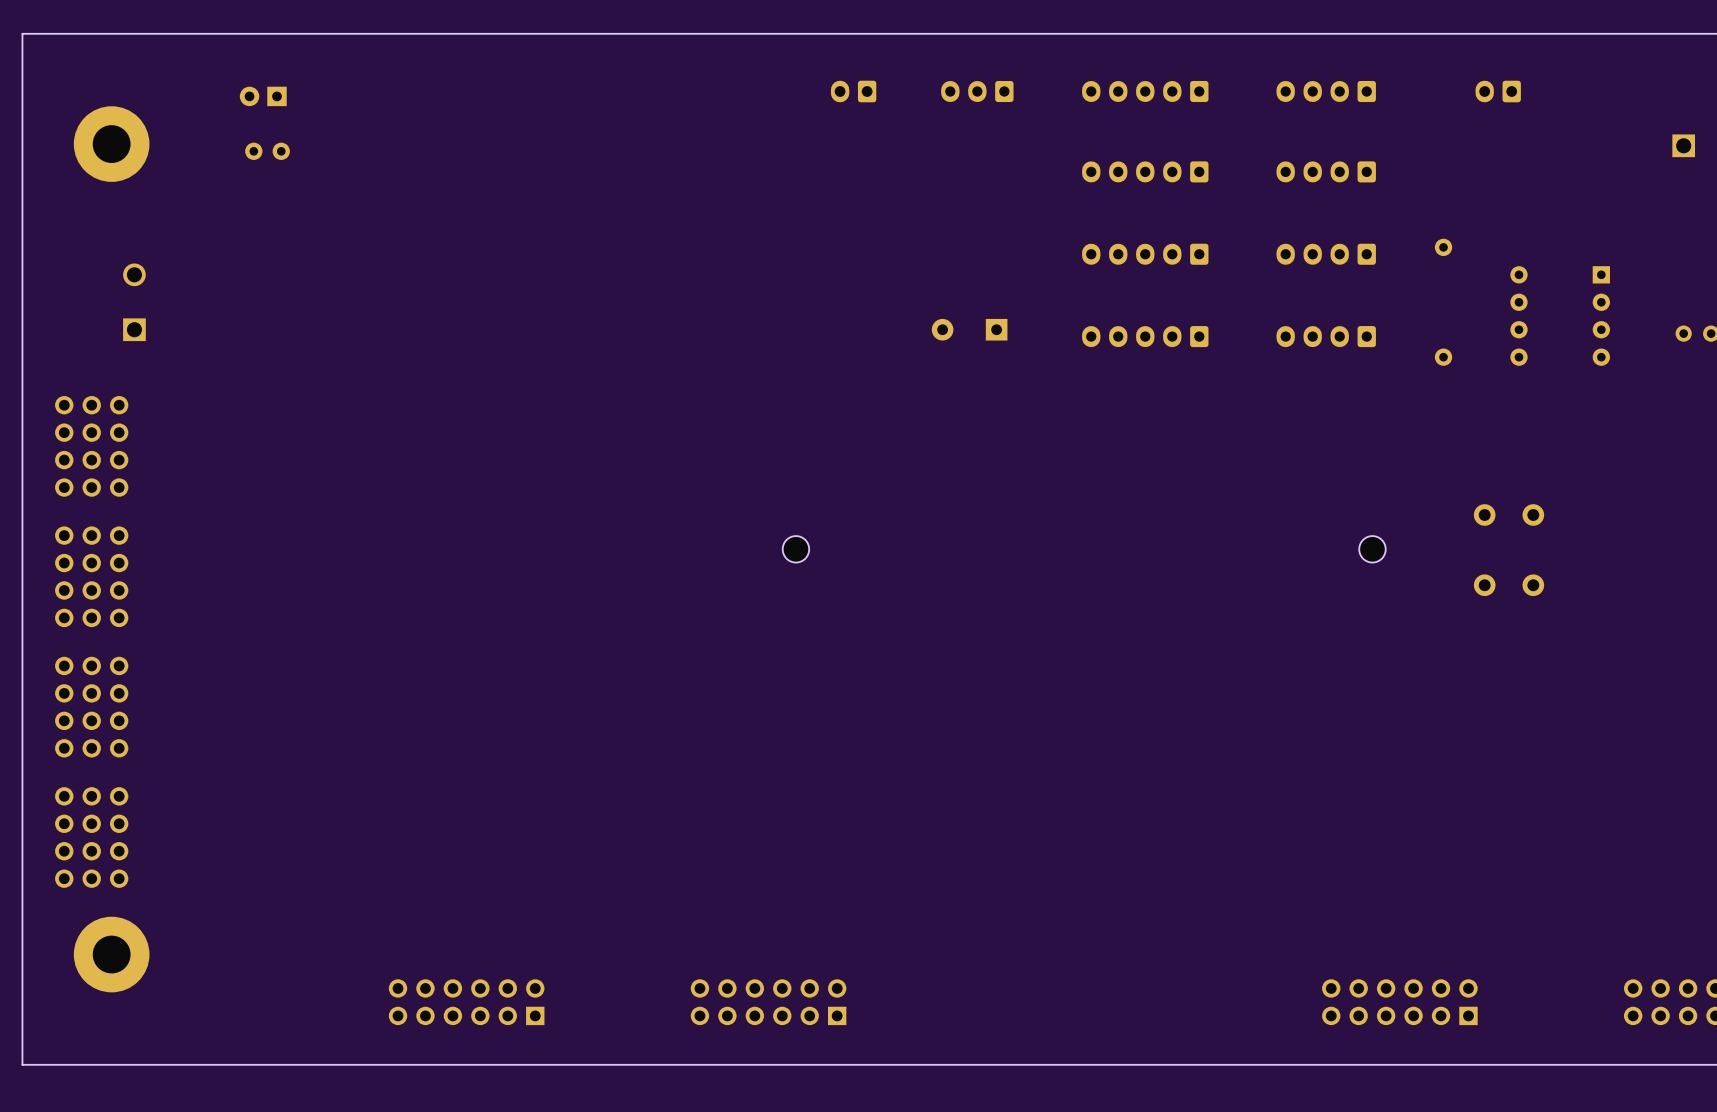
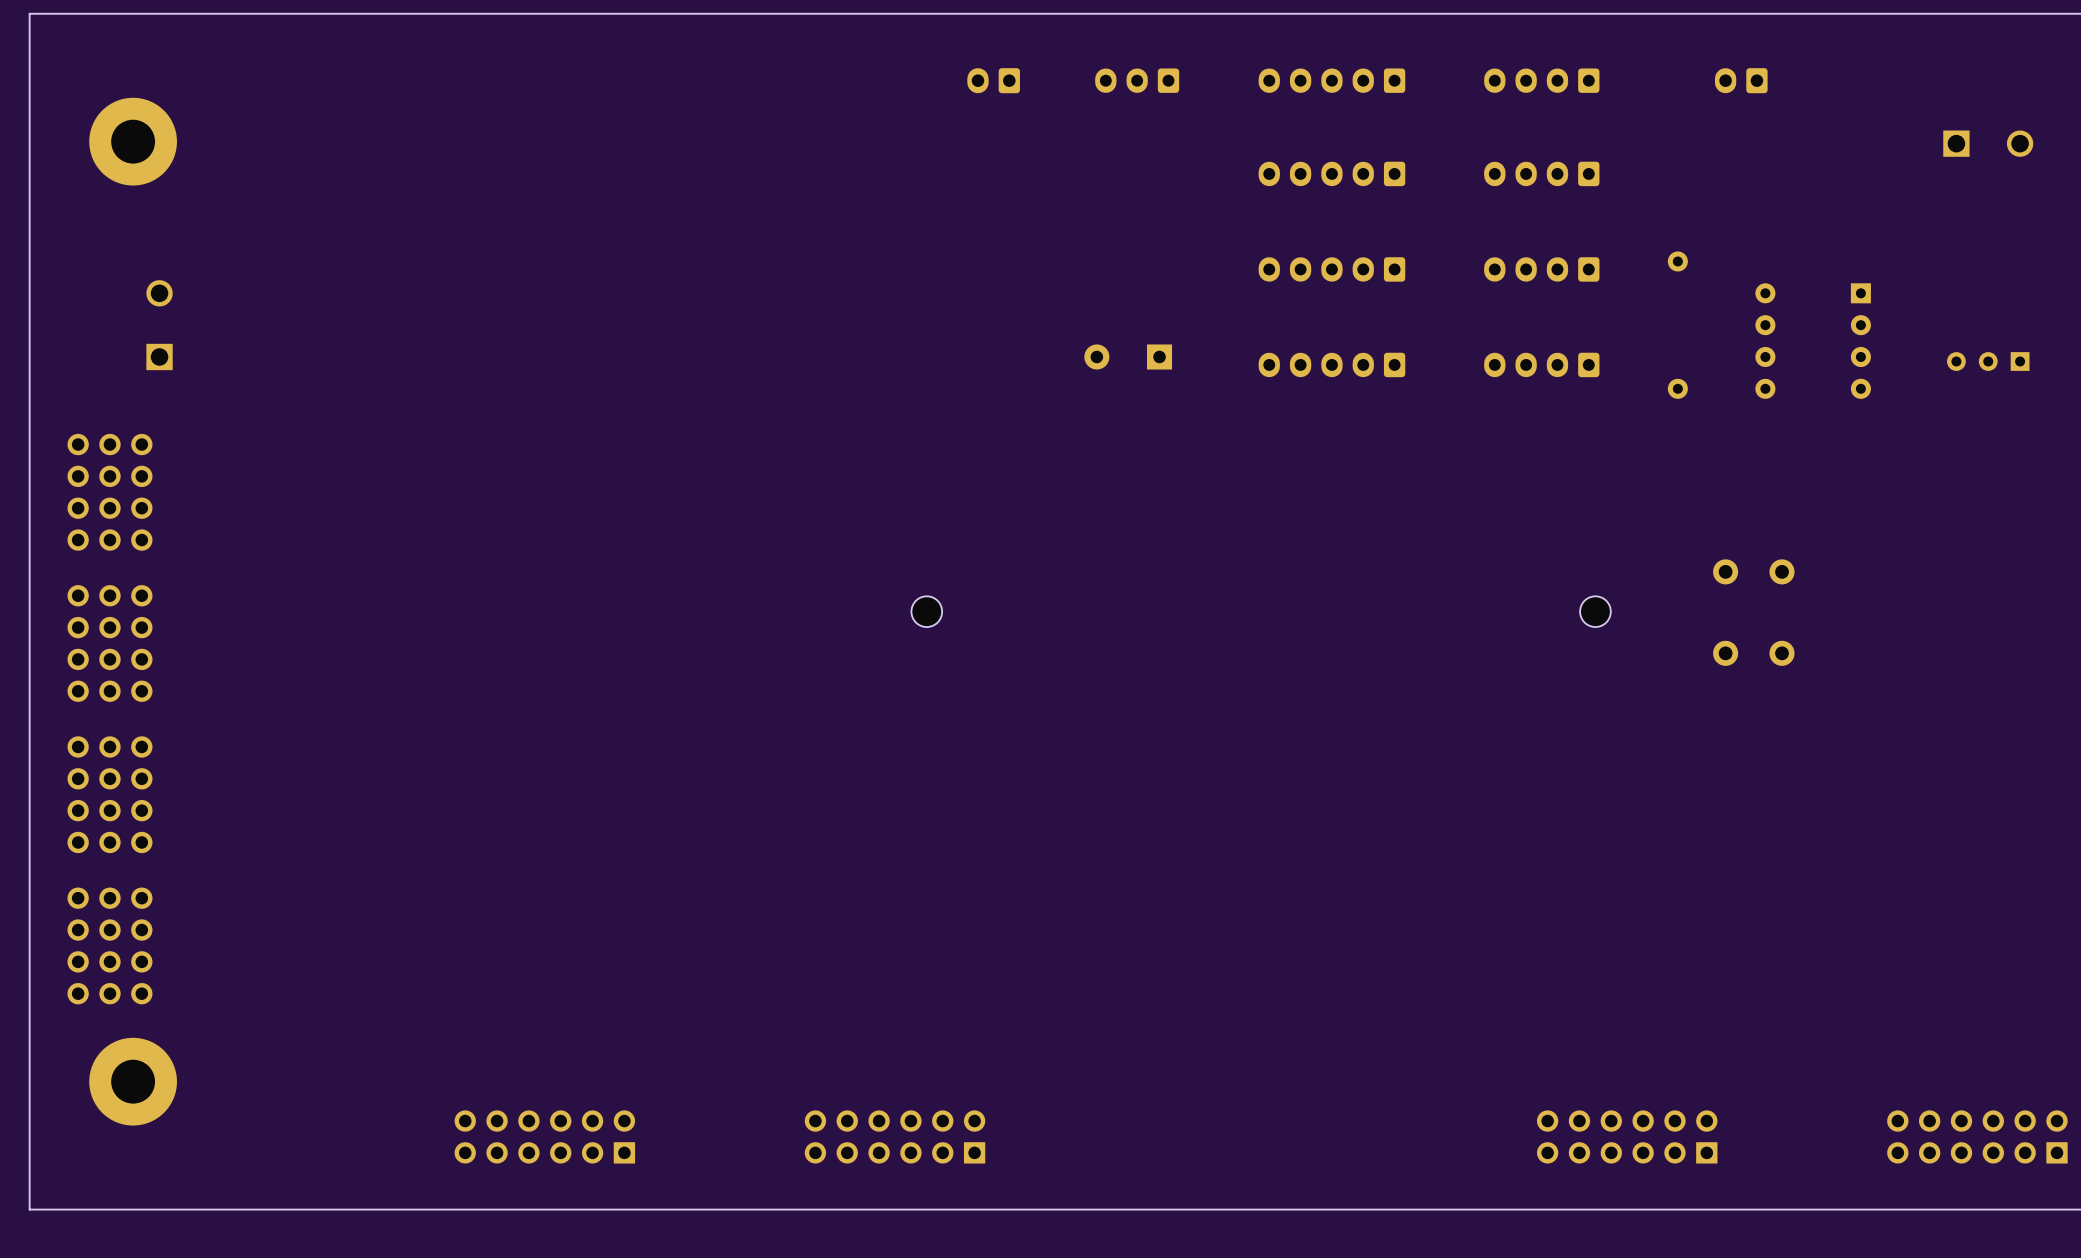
part: (263, 96) -> none
part: (267, 151) -> none

